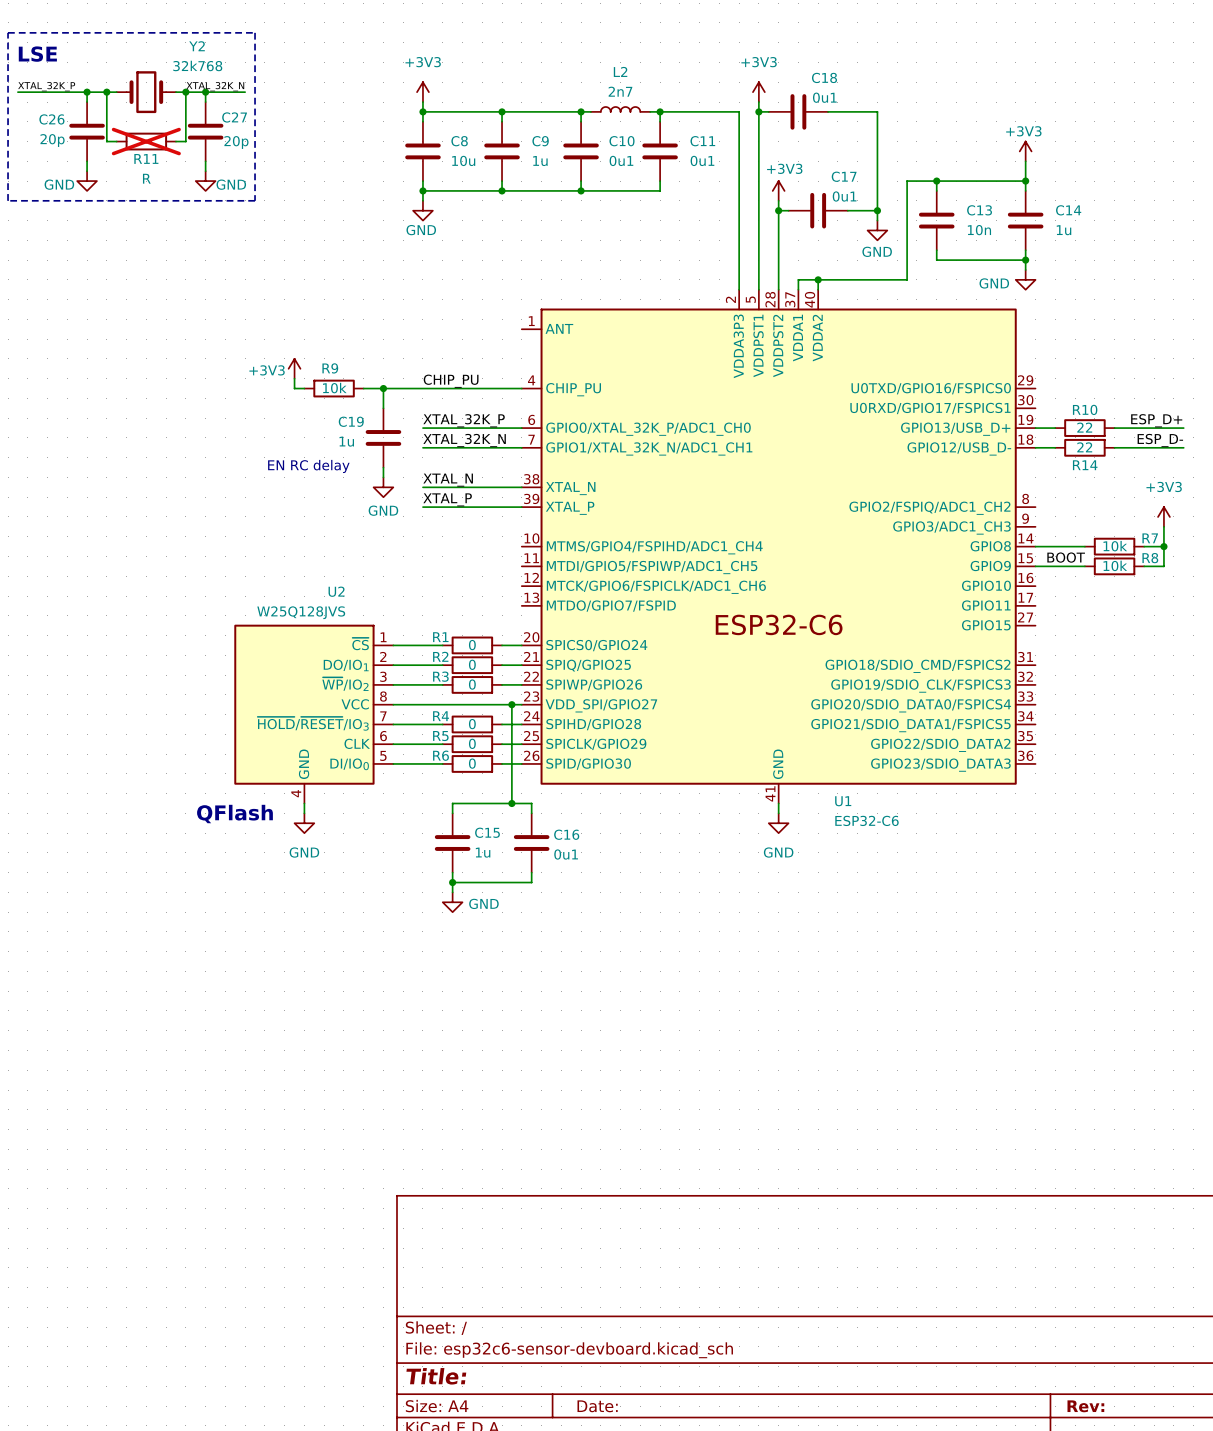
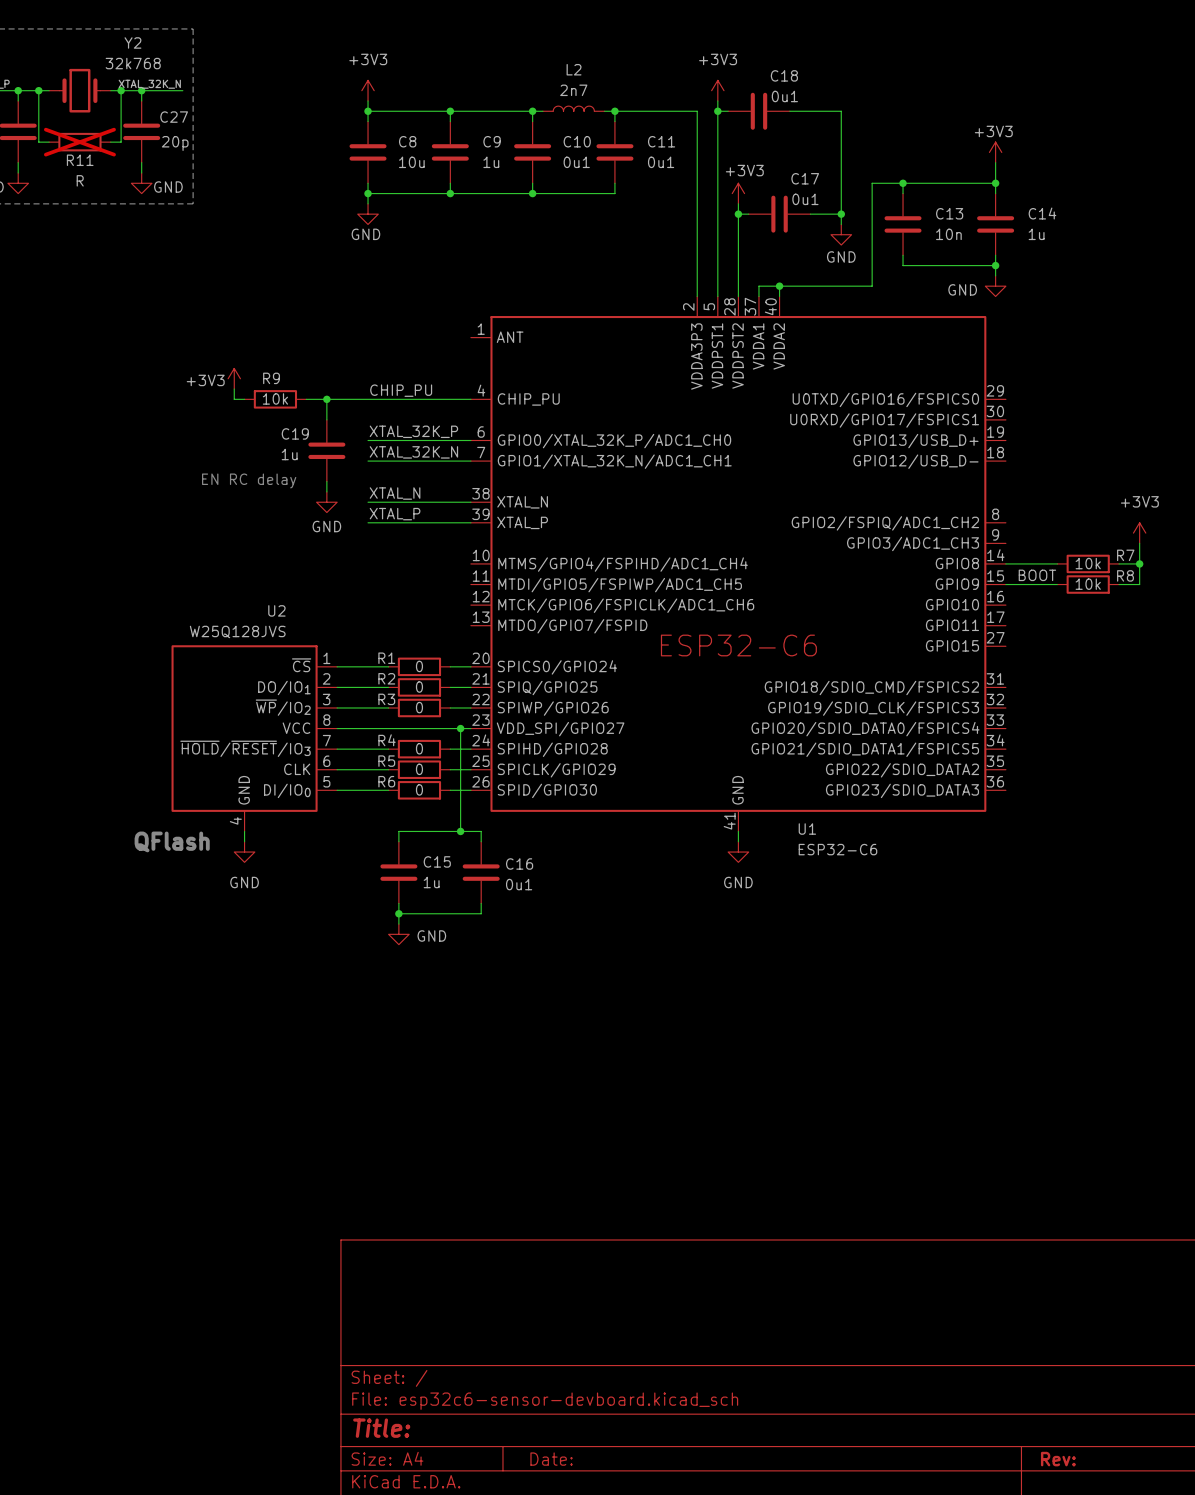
label: ESP_D+ (1156, 420) -> none
wire: (1035, 428) (1055, 428) -> none
R10: 22 (1084, 428) -> none
wire: (1114, 428) (1183, 428) -> none
label: ESP_D- (1160, 440) -> none
wire: (1035, 447) (1055, 447) -> none
R14: 22 (1084, 447) -> none
wire: (1114, 447) (1183, 447) -> none

